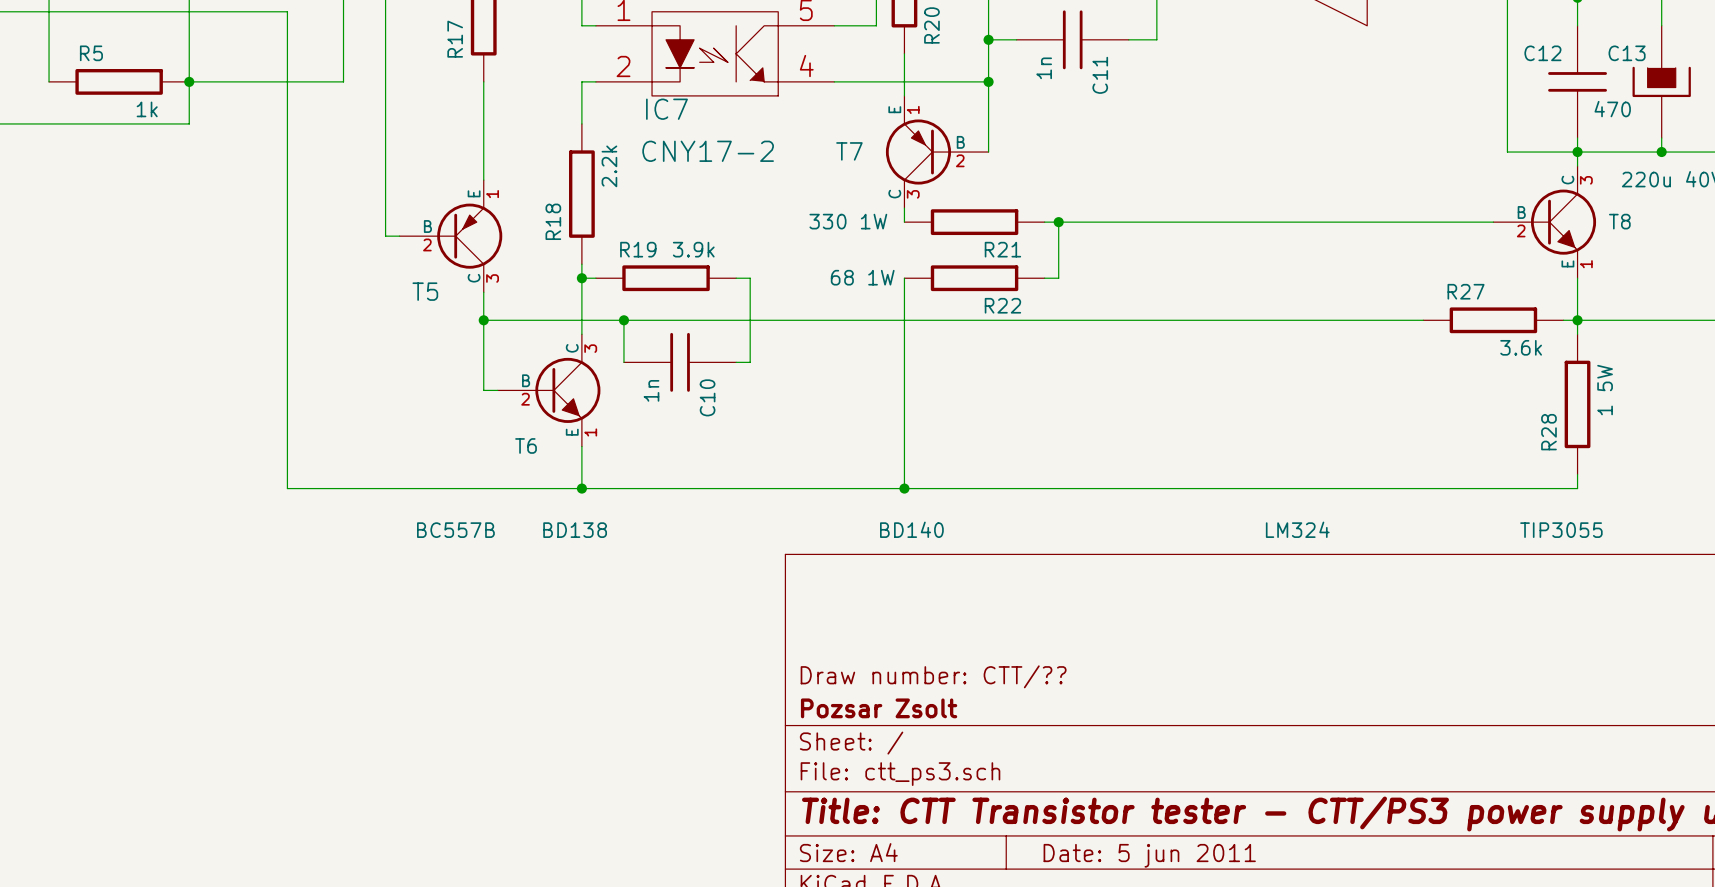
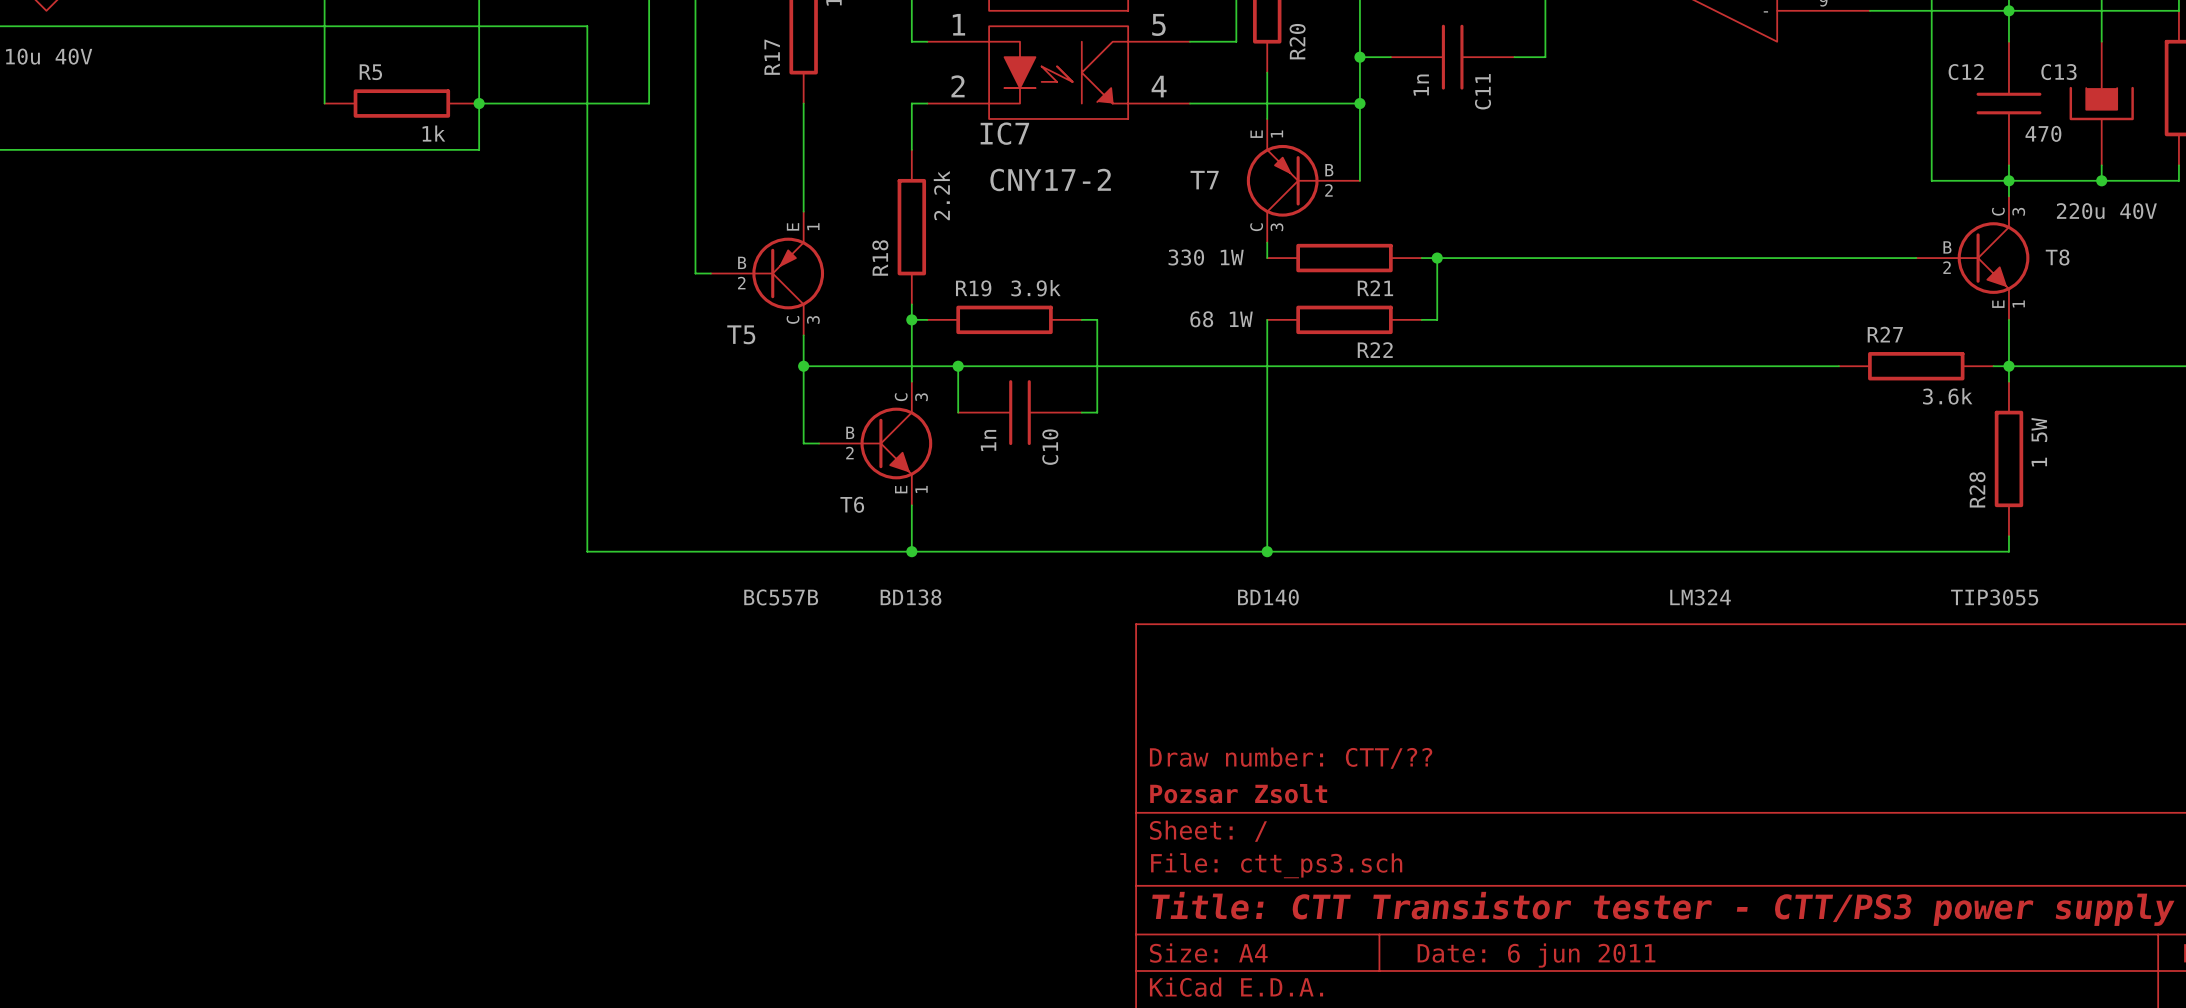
title block: Date: 5 jun 2011 (1149, 855) -> Date: 6 jun 2011 (1536, 955)

